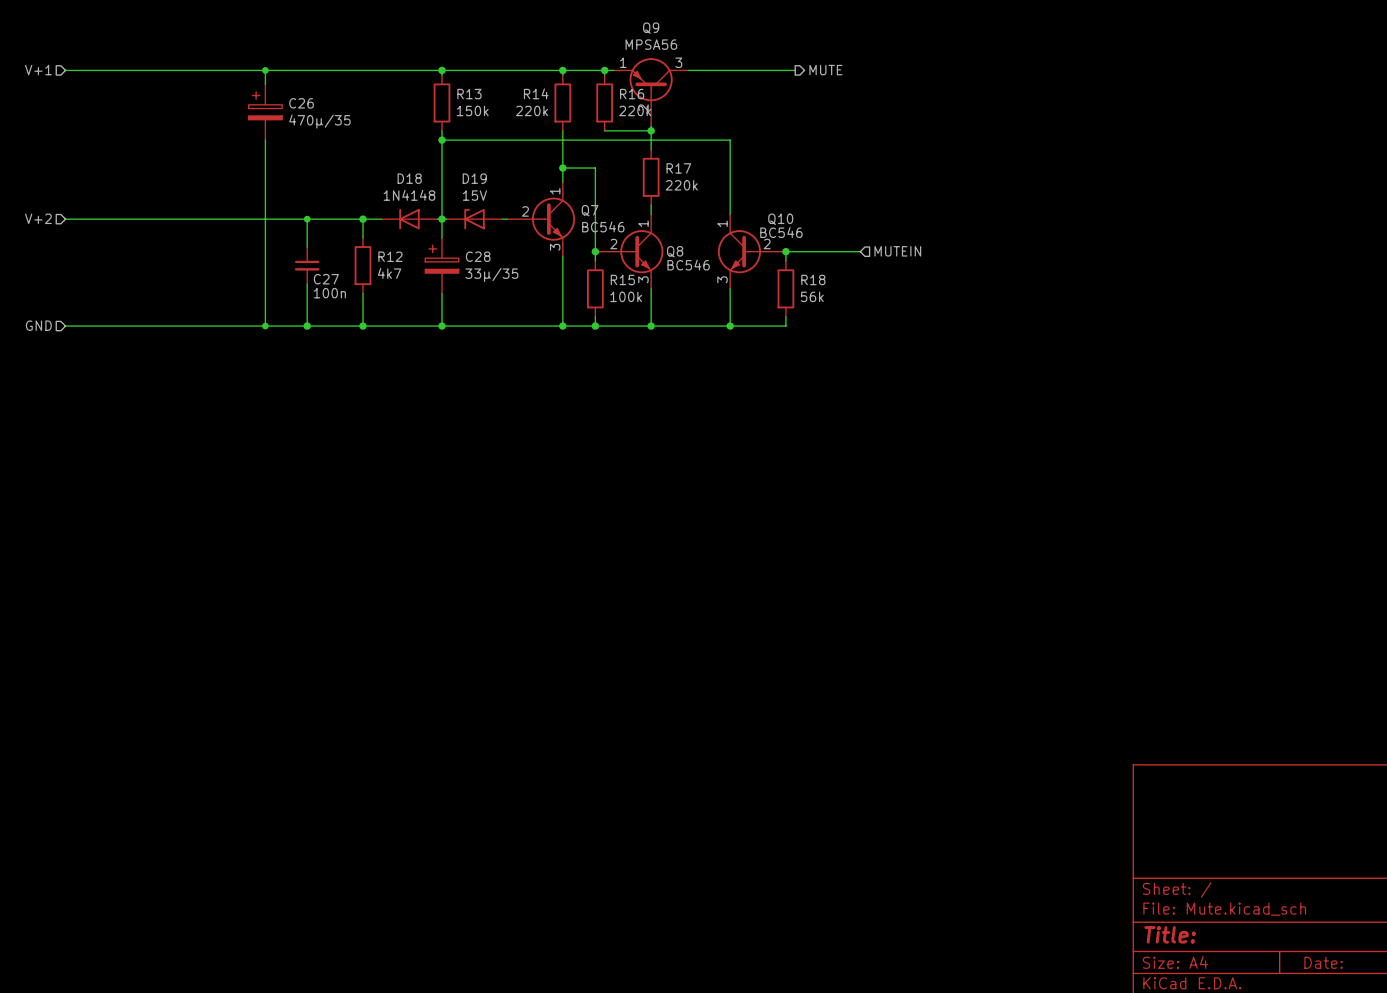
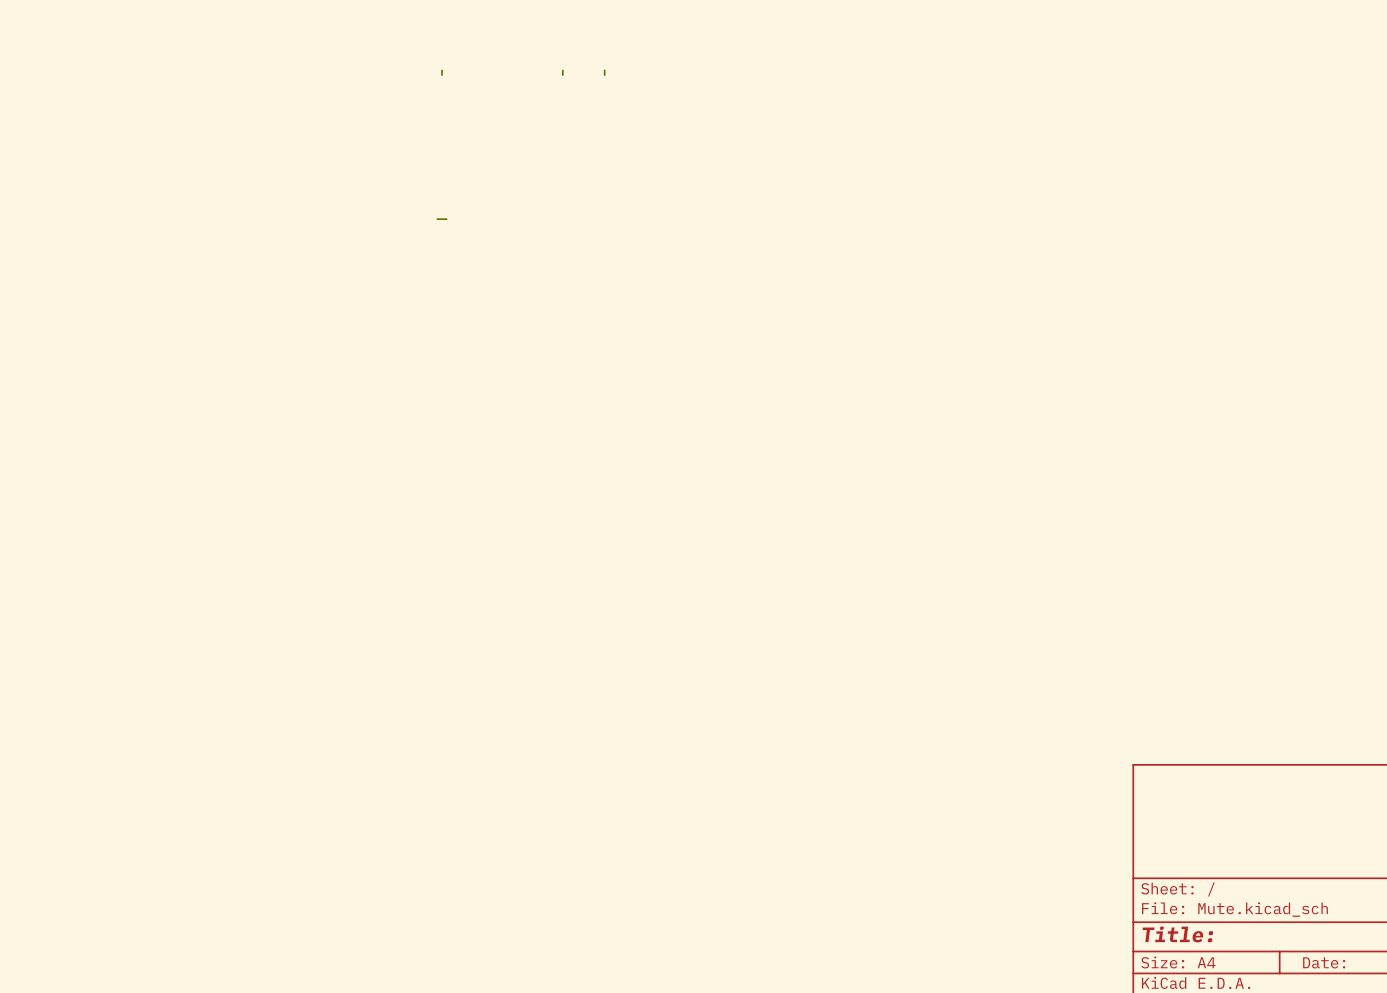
hierarchical label: V+1 (38, 70) -> none
wire: (65, 70) (613, 70) -> none
wire: (265, 70) (265, 84) -> none
junction: (265, 70) -> none
junction: (442, 70) -> none
junction: (562, 70) -> none
junction: (604, 70) -> none
wire: (688, 70) (795, 70) -> none
hierarchical label: MUTE (825, 70) -> none
Q9: MPSA56 (651, 92) -> none
R13: 150k (442, 102) -> none
R14: 220k (562, 102) -> none
R16: 220k (604, 102) -> none
C26: 470µ/35 (265, 112) -> none
wire: (651, 126) (651, 149) -> none
wire: (442, 130) (442, 237) -> none
wire: (562, 130) (562, 181) -> none
wire: (604, 130) (651, 130) -> none
junction: (651, 130) -> none
wire: (265, 140) (265, 326) -> none
wire: (442, 140) (730, 140) (730, 214) -> none
junction: (442, 140) -> none
wire: (562, 168) (595, 168) (595, 260) -> none
junction: (562, 168) -> none
R17: 220k (651, 177) -> none
wire: (651, 205) (651, 214) -> none
hierarchical label: V+2 (38, 218) -> none
wire: (65, 219) (381, 219) -> none
wire: (307, 219) (307, 247) -> none
junction: (307, 219) -> none
wire: (362, 219) (362, 237) -> none
junction: (362, 219) -> none
D18: 1N4148 (409, 219) -> none
junction: (442, 219) -> none
D19: 15V (474, 219) -> none
wire: (502, 219) (507, 219) -> none
Q7: BC546 (541, 219) -> none
junction: (595, 251) -> none
Q8: BC546 (629, 251) -> none
Q10: BC546 (751, 251) -> none
junction: (785, 251) -> none
wire: (860, 251) (785, 251) (785, 260) -> none
hierarchical label: MUTEIN (897, 251) -> none
wire: (562, 256) (562, 326) -> none
C27: 100n (307, 265) -> none
R12: 4k7 (362, 265) -> none
C28: 33µ/35 (442, 265) -> none
wire: (307, 284) (307, 326) -> none
R15: 100k (595, 288) -> none
wire: (651, 288) (651, 326) -> none
wire: (730, 288) (730, 326) -> none
R18: 56k (785, 288) -> none
wire: (362, 293) (362, 326) -> none
wire: (442, 293) (442, 326) -> none
wire: (595, 316) (595, 326) -> none
wire: (785, 316) (785, 326) (65, 326) -> none
hierarchical label: GND (38, 325) -> none
junction: (265, 326) -> none
junction: (307, 326) -> none
junction: (362, 326) -> none
junction: (442, 326) -> none
junction: (562, 326) -> none
junction: (595, 326) -> none
junction: (651, 326) -> none
junction: (730, 326) -> none

